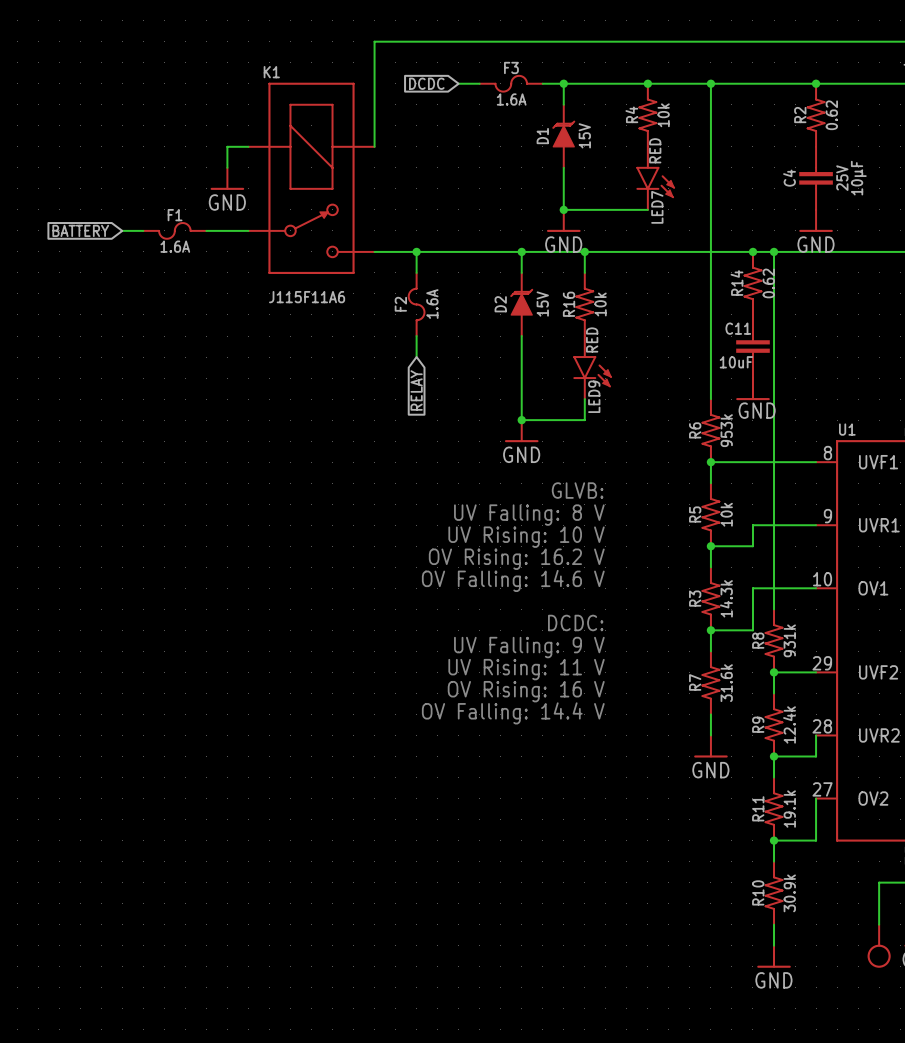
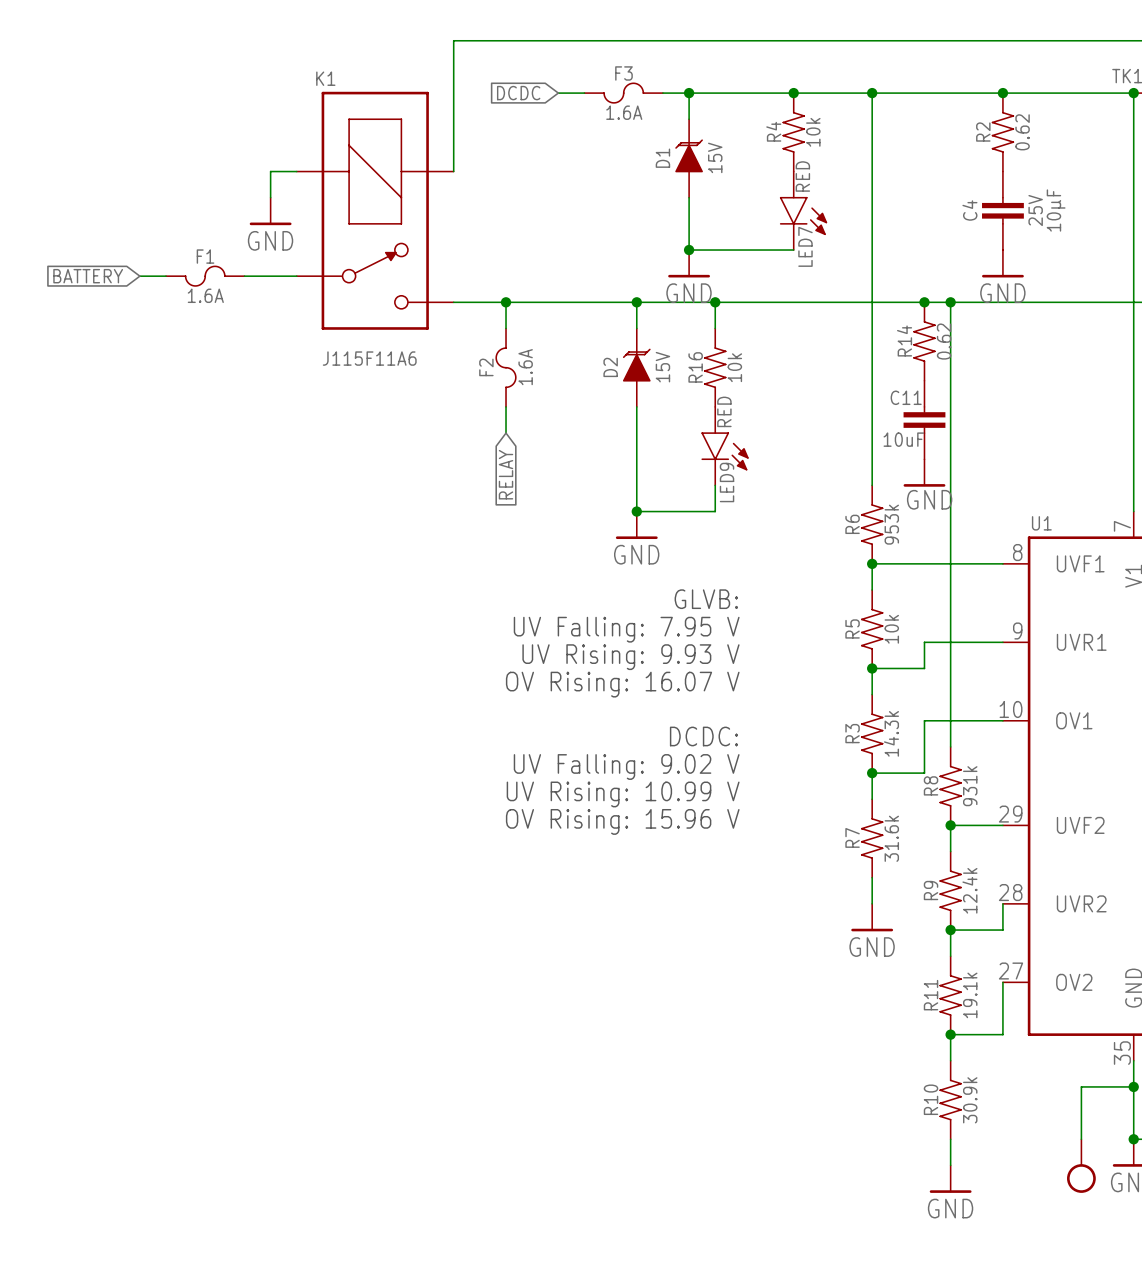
text: UV Falling: 8 V (529, 515) -> UV Falling: 7.95 V (626, 629)
text: UV Rising: 10 V (526, 537) -> UV Rising: 9.93 V (630, 657)
text: OV Rising: 16.2 V (516, 559) -> OV Rising: 16.07 V (622, 684)
text: OV Falling: 14.6 V (513, 580) -> none
text: none -> DCDC: (703, 736)
text: DCDC: (575, 622) -> UV Falling: 9.02 V (626, 767)
text: UV Falling: 9 V (529, 647) -> UV Rising: 10.99 V (623, 794)
text: UV Rising: 11 V (526, 669) -> OV Rising: 15.96 V (622, 821)
text: OV Rising: 16 V (526, 691) -> none
text: OV Falling: 14.4 V (513, 713) -> none

